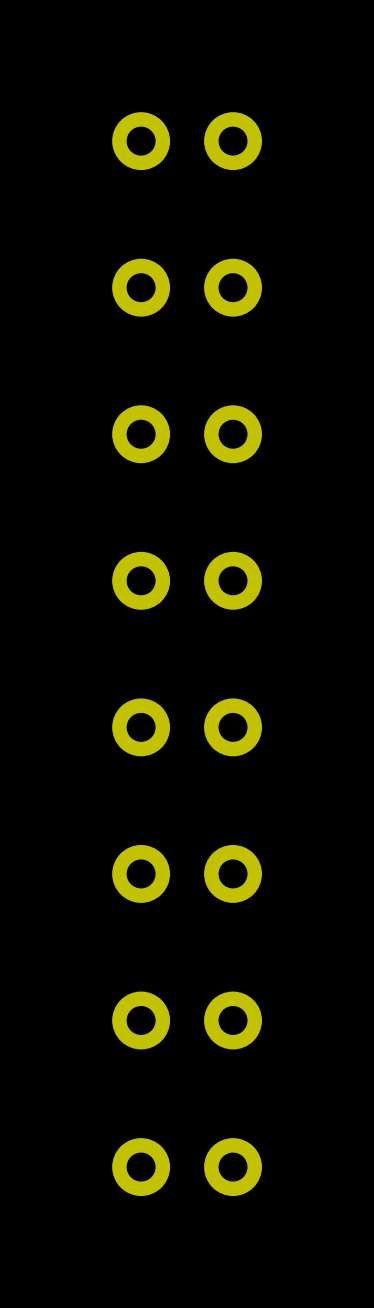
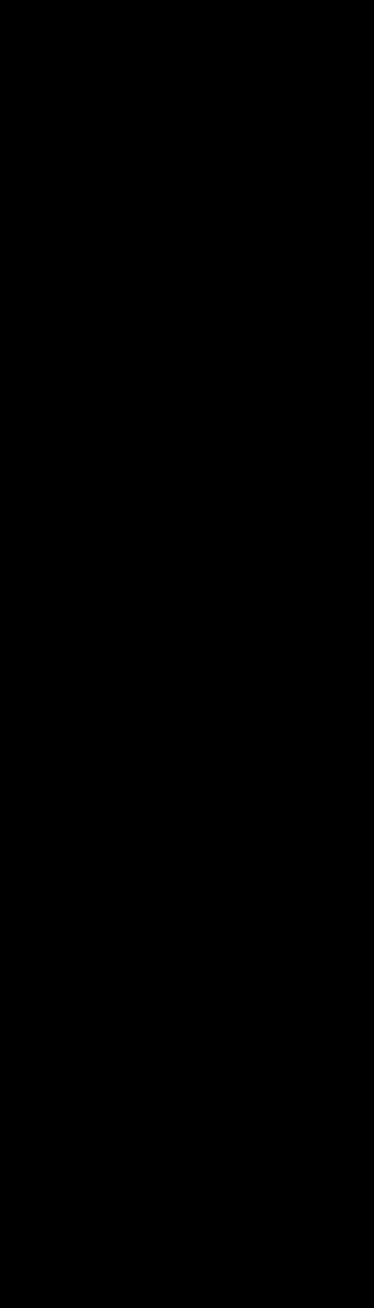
part: (187, 141) -> none
part: (187, 287) -> none
part: (187, 434) -> none
part: (187, 580) -> none
part: (187, 727) -> none
part: (187, 873) -> none
part: (187, 1020) -> none
part: (187, 1167) -> none

